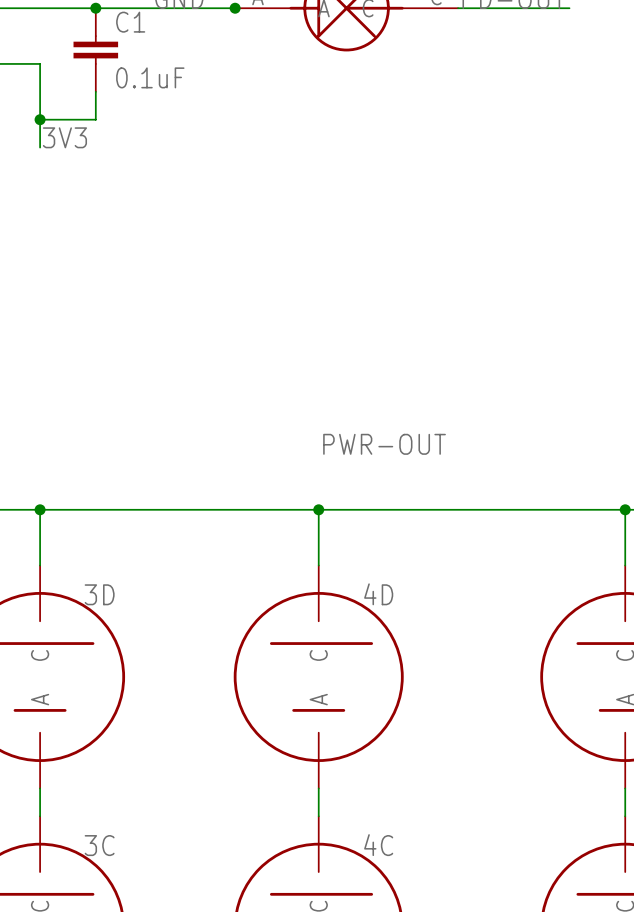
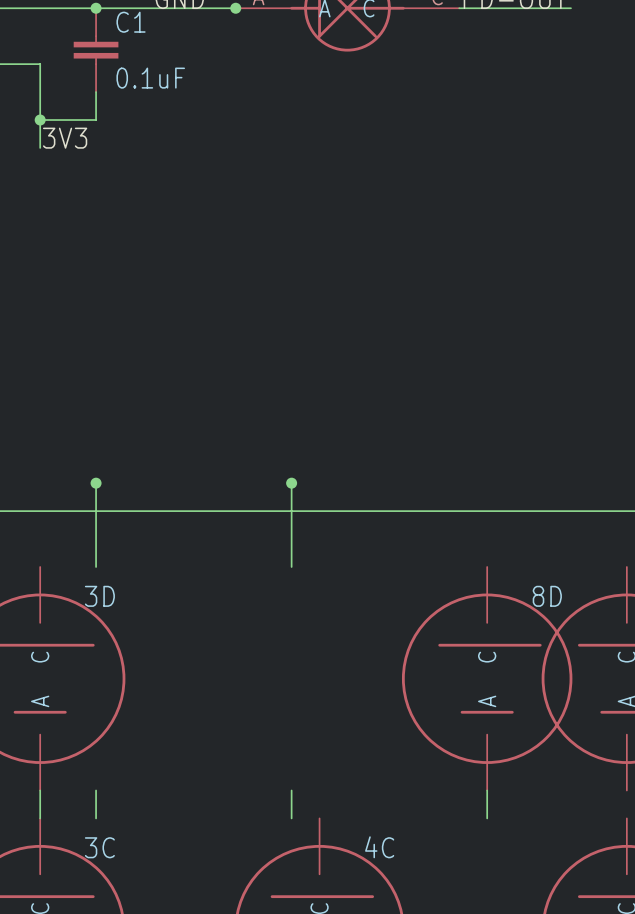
label: PWR-OUT (384, 444) -> none
wire: none -> (96, 483) (96, 566)
wire: none -> (291, 483) (291, 566)
wire: (40, 509) (40, 565) -> none
junction position: (40, 509) -> (96, 483)
wire: (318, 509) (318, 565) -> none
junction position: (318, 509) -> (291, 483)
wire: (625, 509) (625, 565) -> none
junction: (625, 509) -> none
4D: (318, 676) -> none
8D: none -> (487, 678)
wire: none -> (96, 790) (96, 818)
wire: (318, 788) (318, 816) -> (291, 790) (291, 818)
wire: (625, 788) (625, 816) -> (487, 790) (487, 818)

